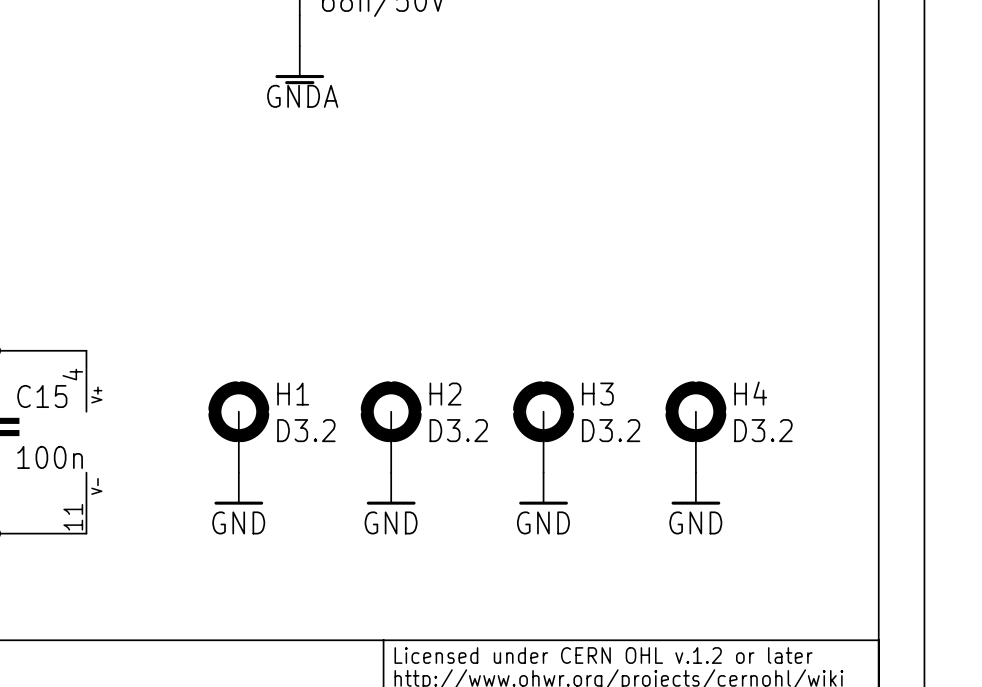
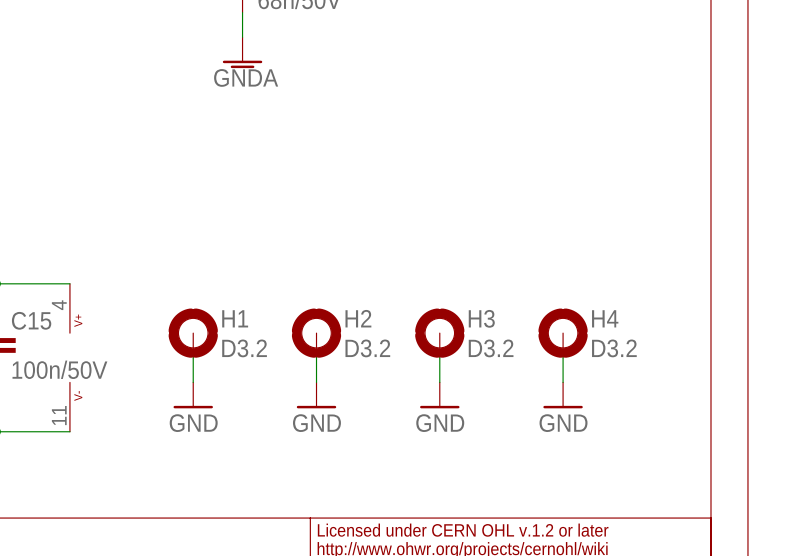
C15 value: 100n (50, 457) -> 100n/50V (59, 369)

